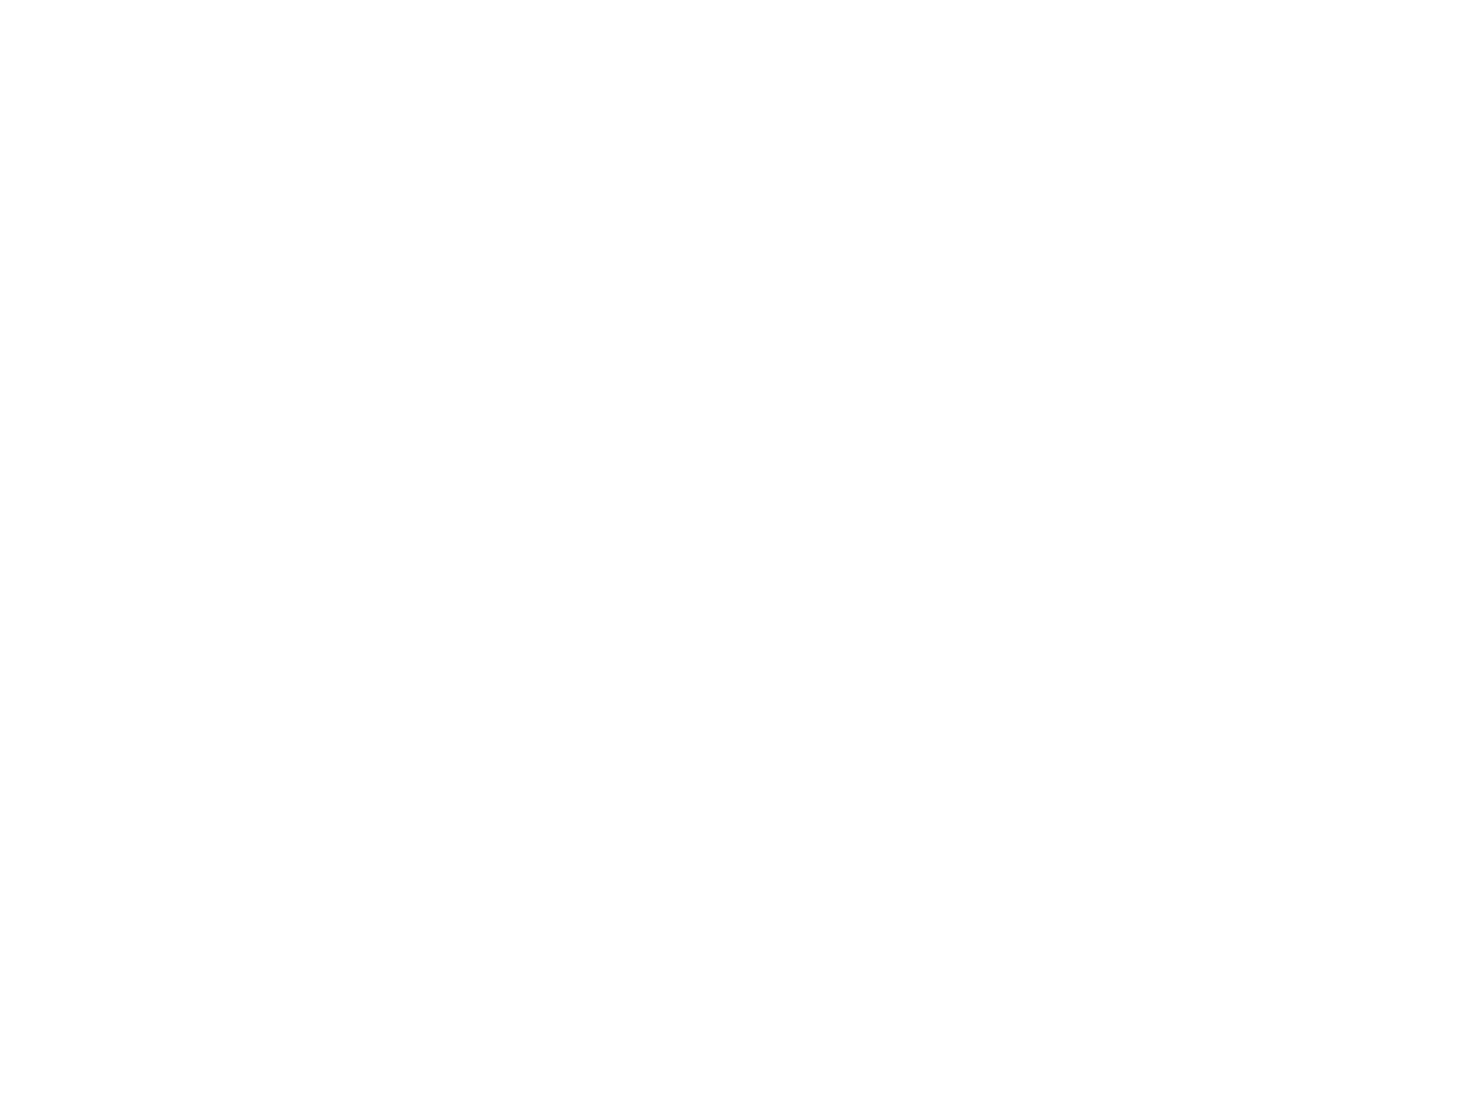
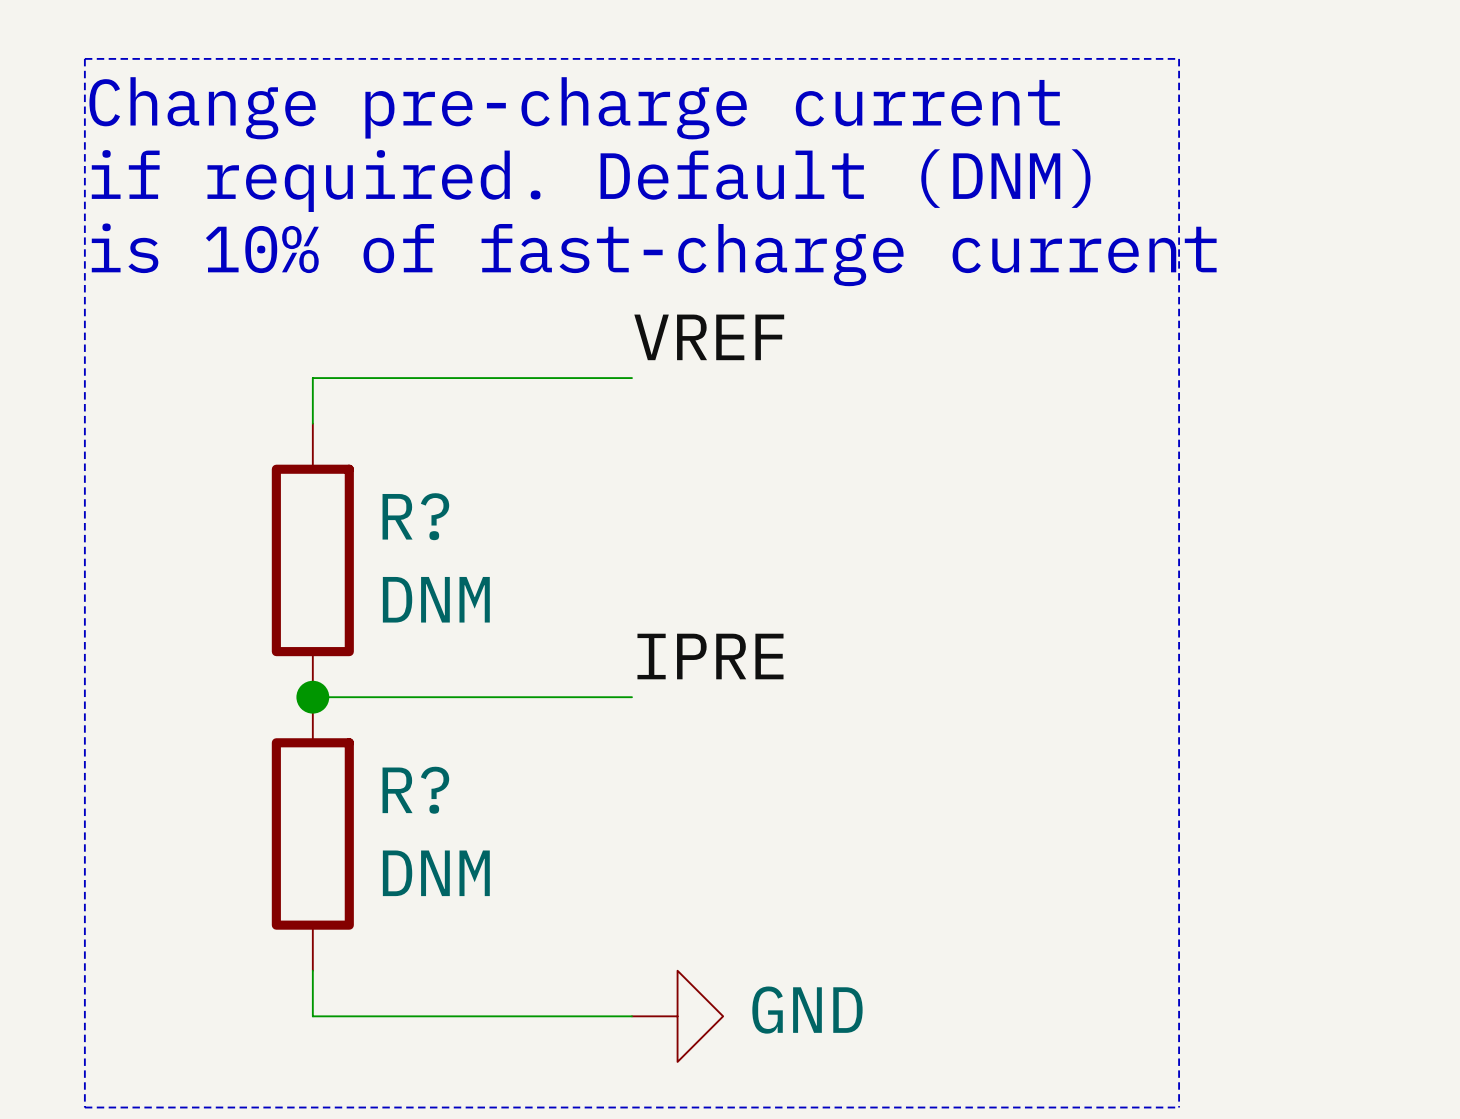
line: none -> (84, 58) (84, 1107) (1179, 1107) (1179, 58) (84, 58)
text: none -> Change pre-charge current (574, 108)
text: none -> if required. Default (DNM) (591, 180)
text: none -> is 10% of fast-charge current (654, 254)
label: none -> VREF (709, 337)
wire: none -> (631, 378) (312, 378) (312, 423)
R?: none -> DNM (312, 560)
label: none -> IPRE (710, 656)
wire: none -> (312, 697) (631, 697)
junction: none -> (312, 697)
R?: none -> DNM (312, 833)
wire: none -> (312, 970) (312, 1016) (631, 1016)
power symbol: none -> GND (677, 1016)

